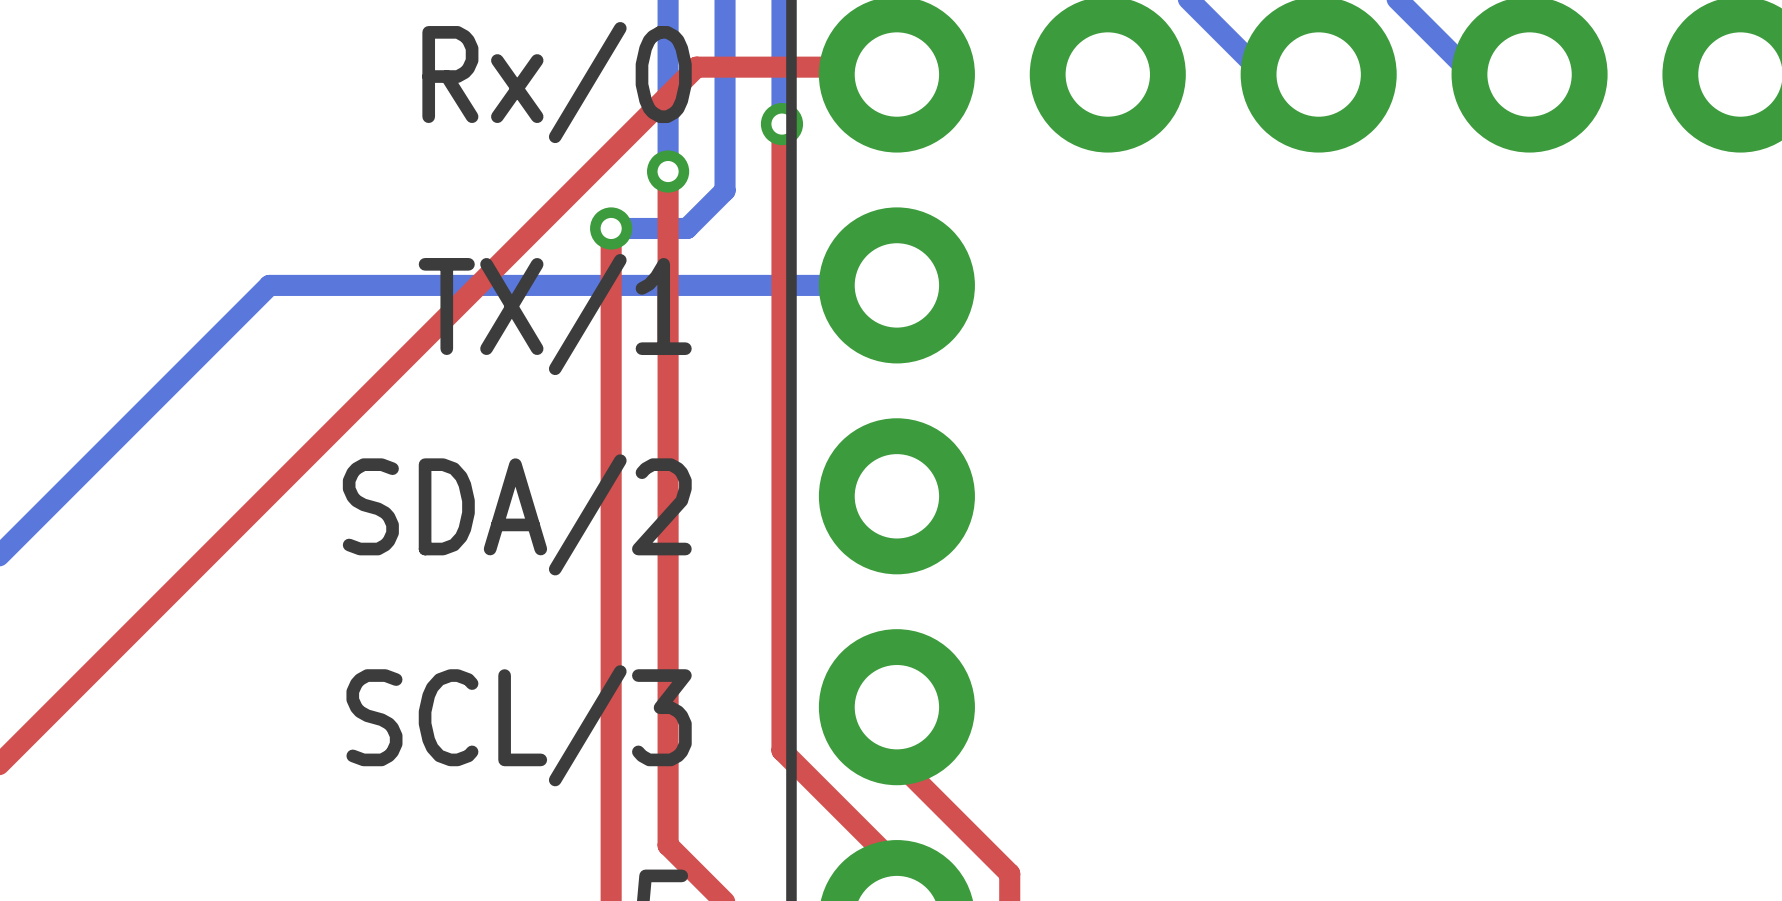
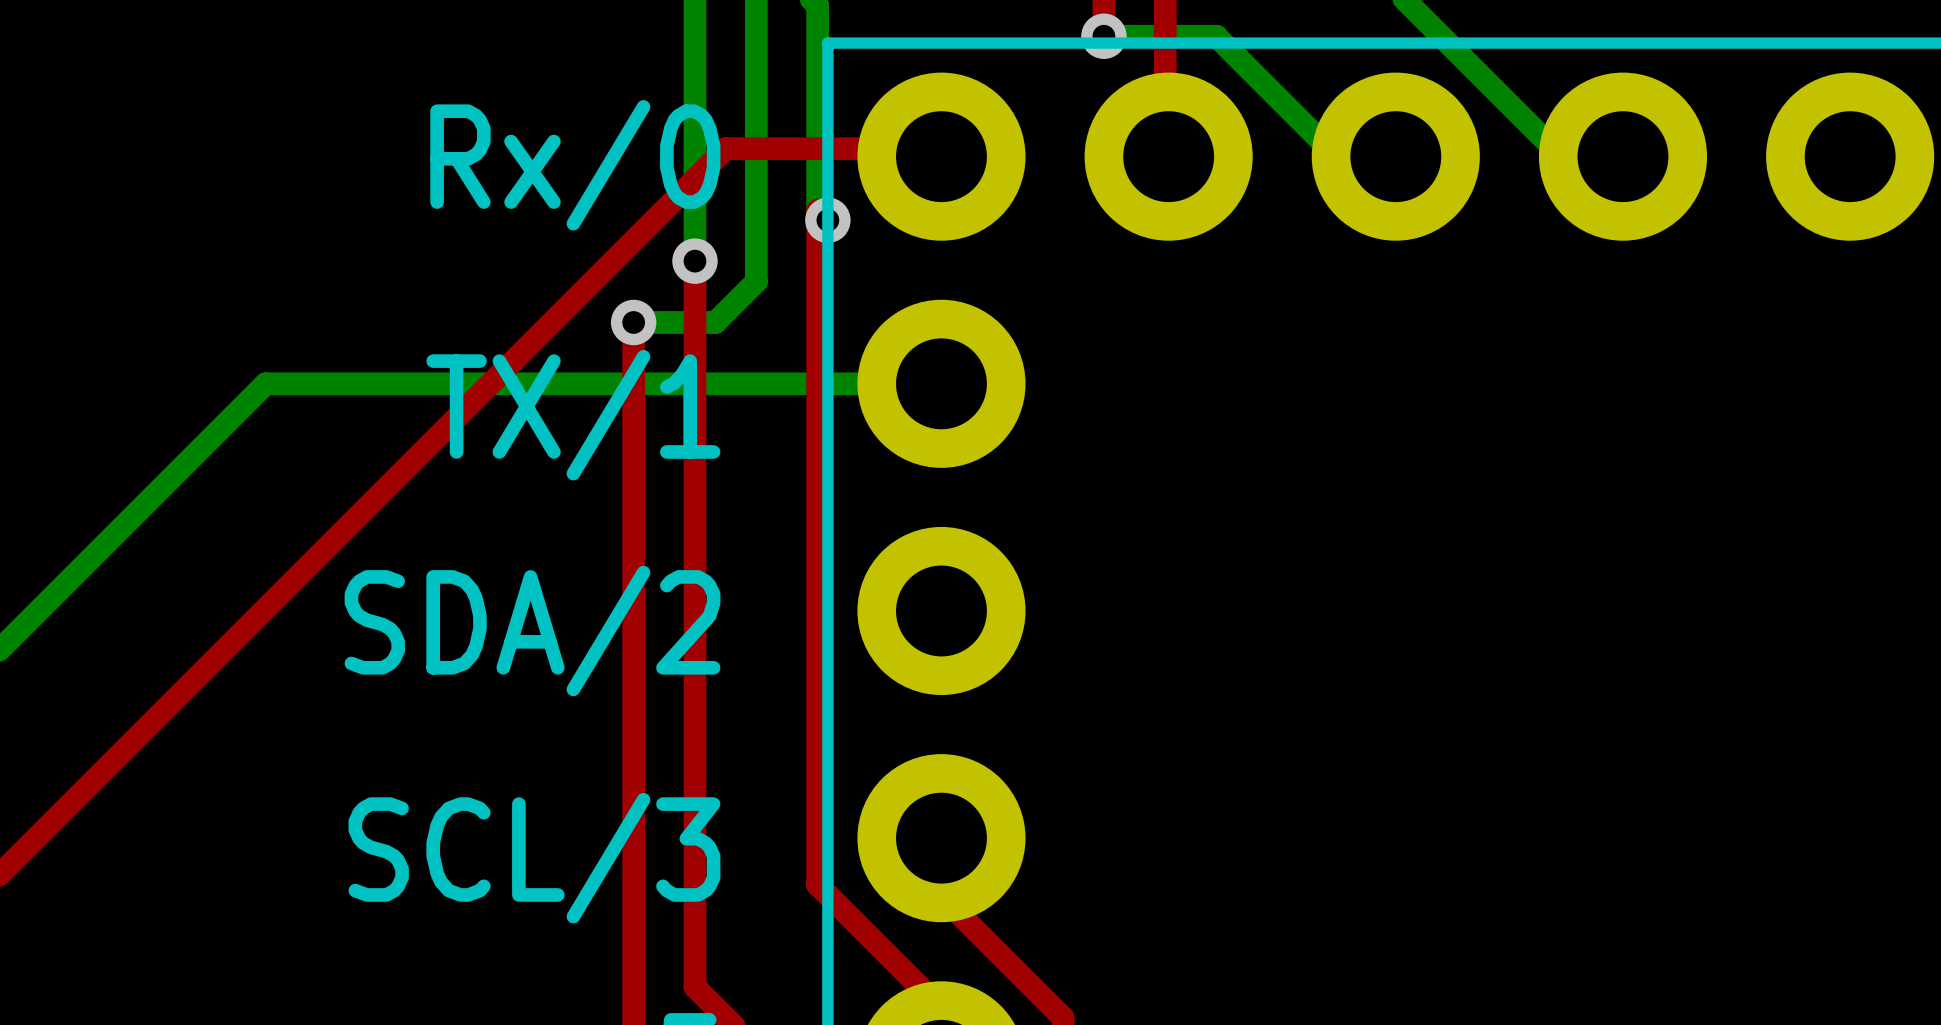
via position: (781, 124) -> (827, 220)

